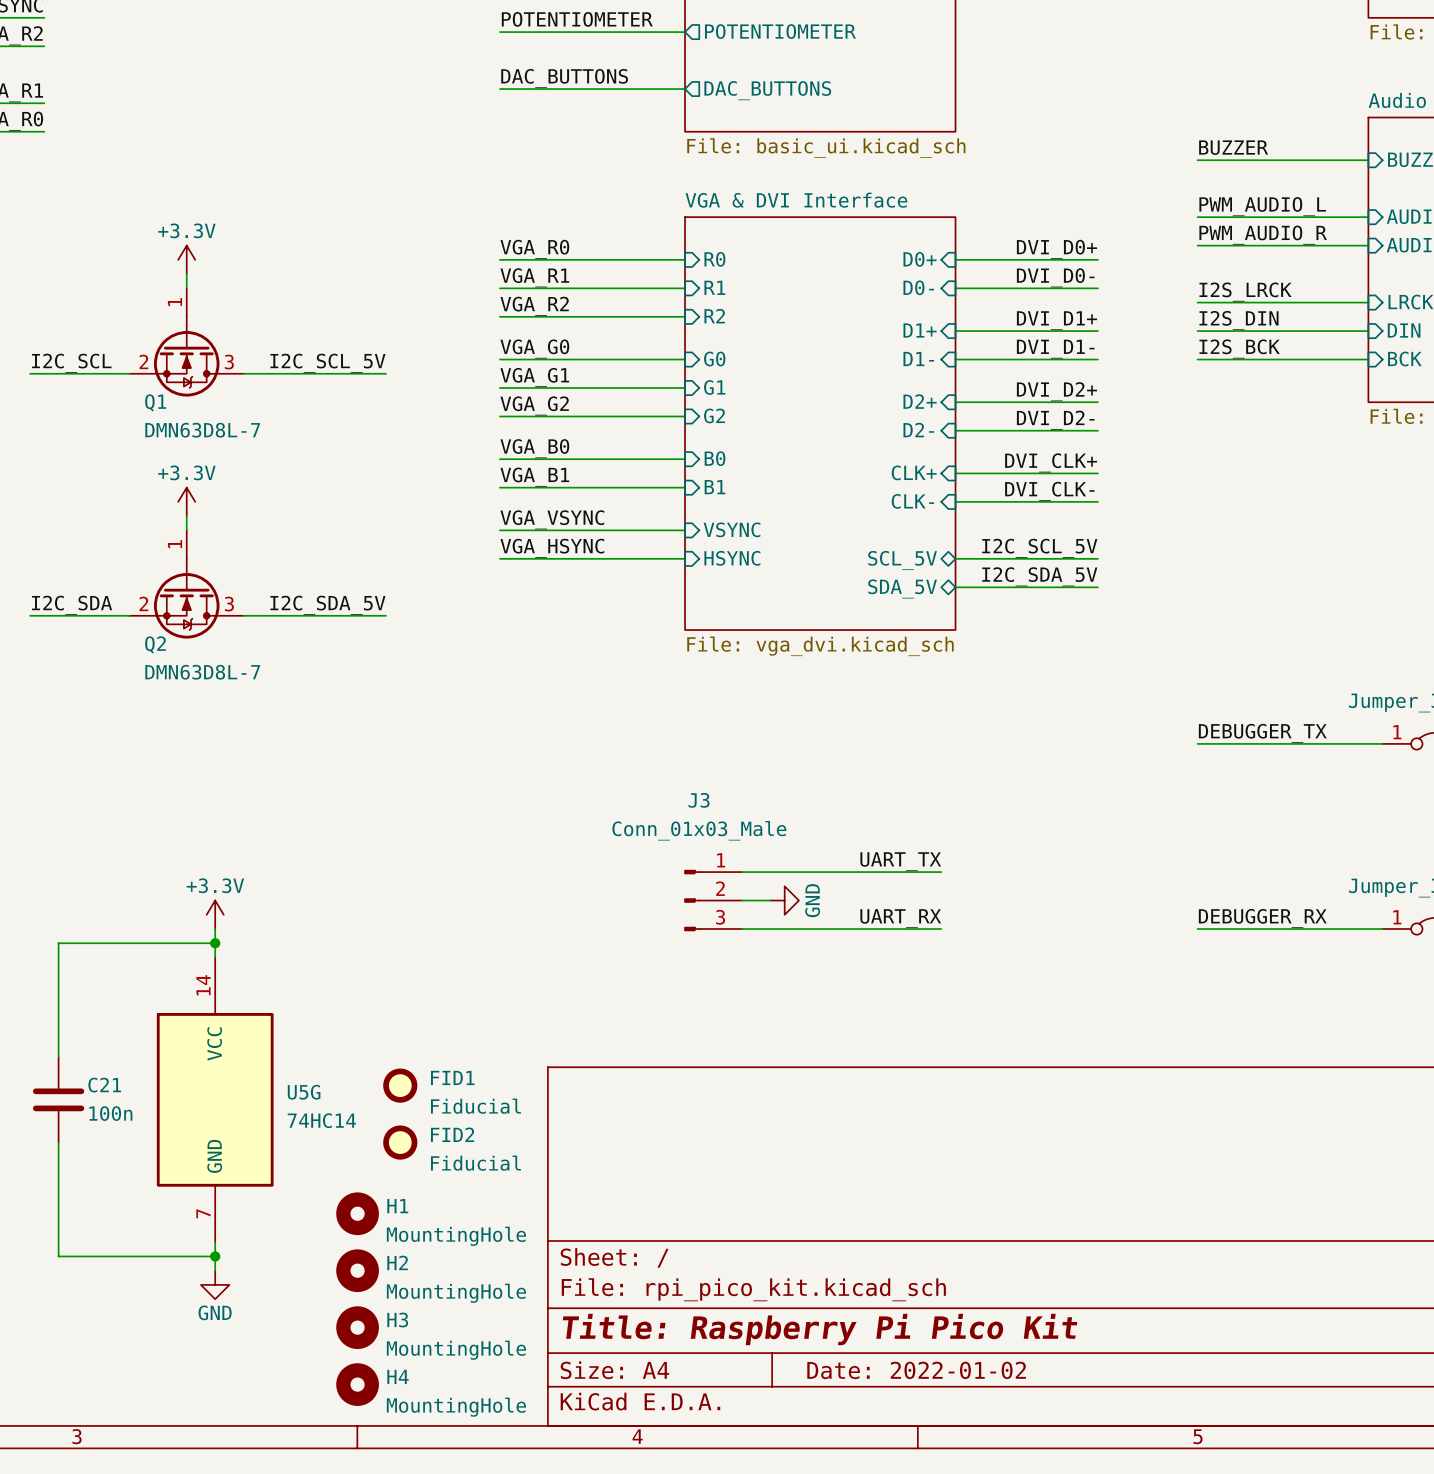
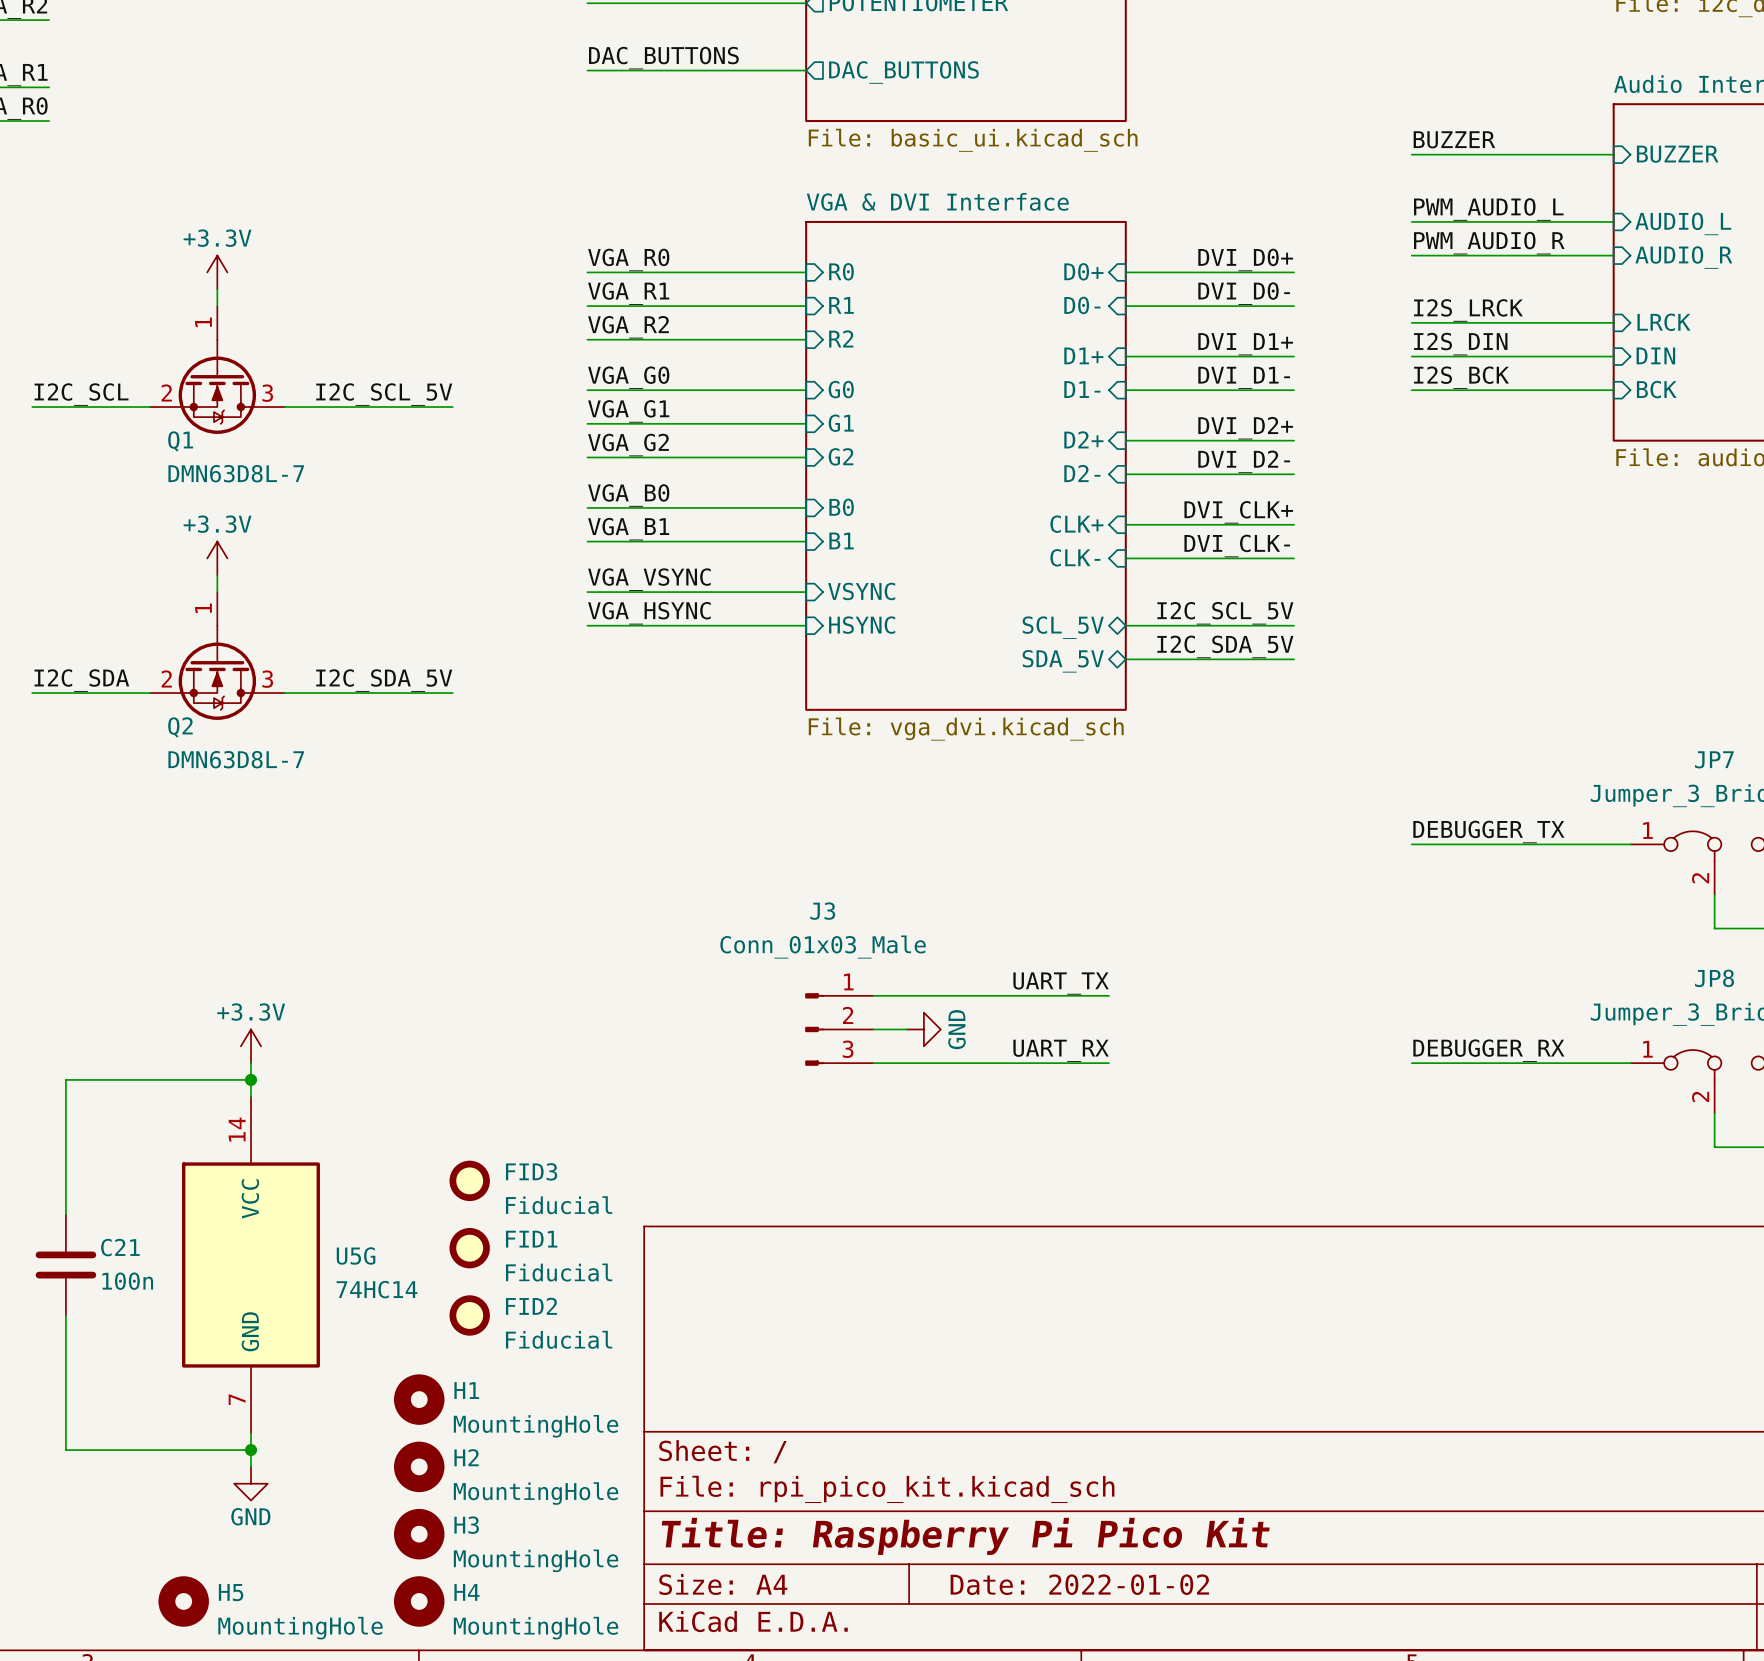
FID3: none -> Fiducial (469, 1180)
H5: none -> MountingHole (183, 1601)

